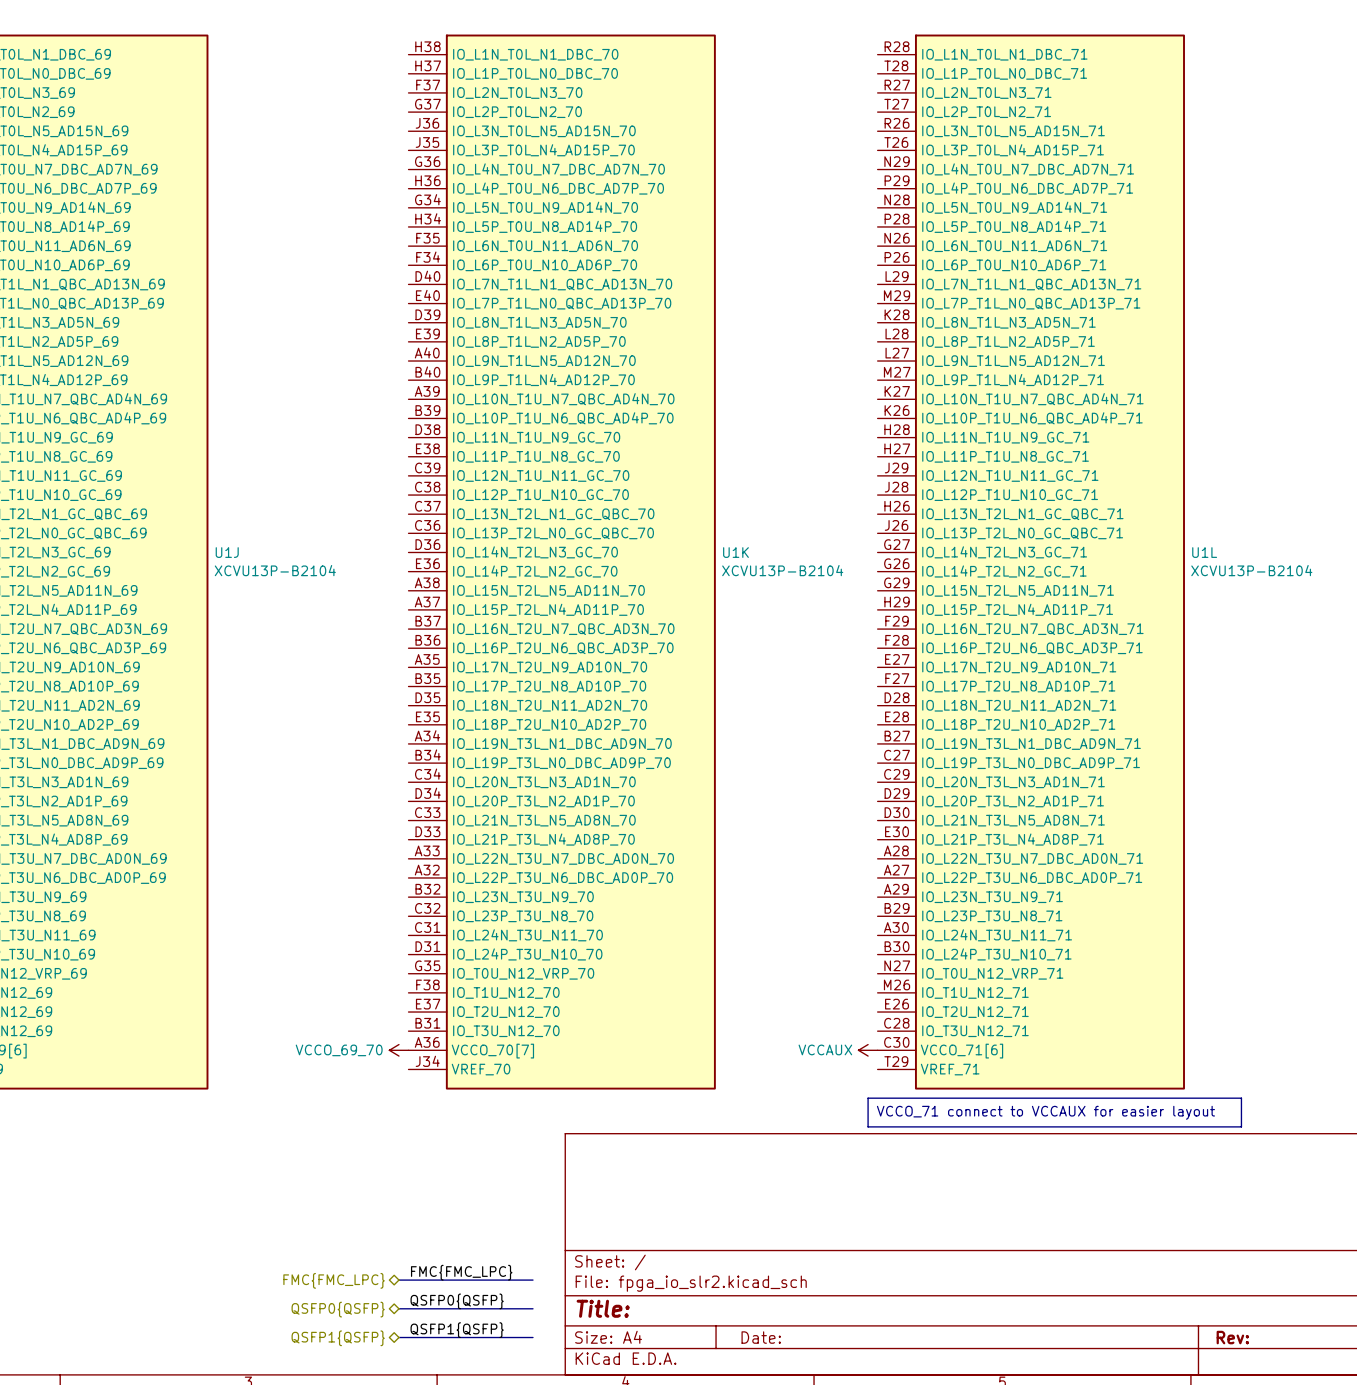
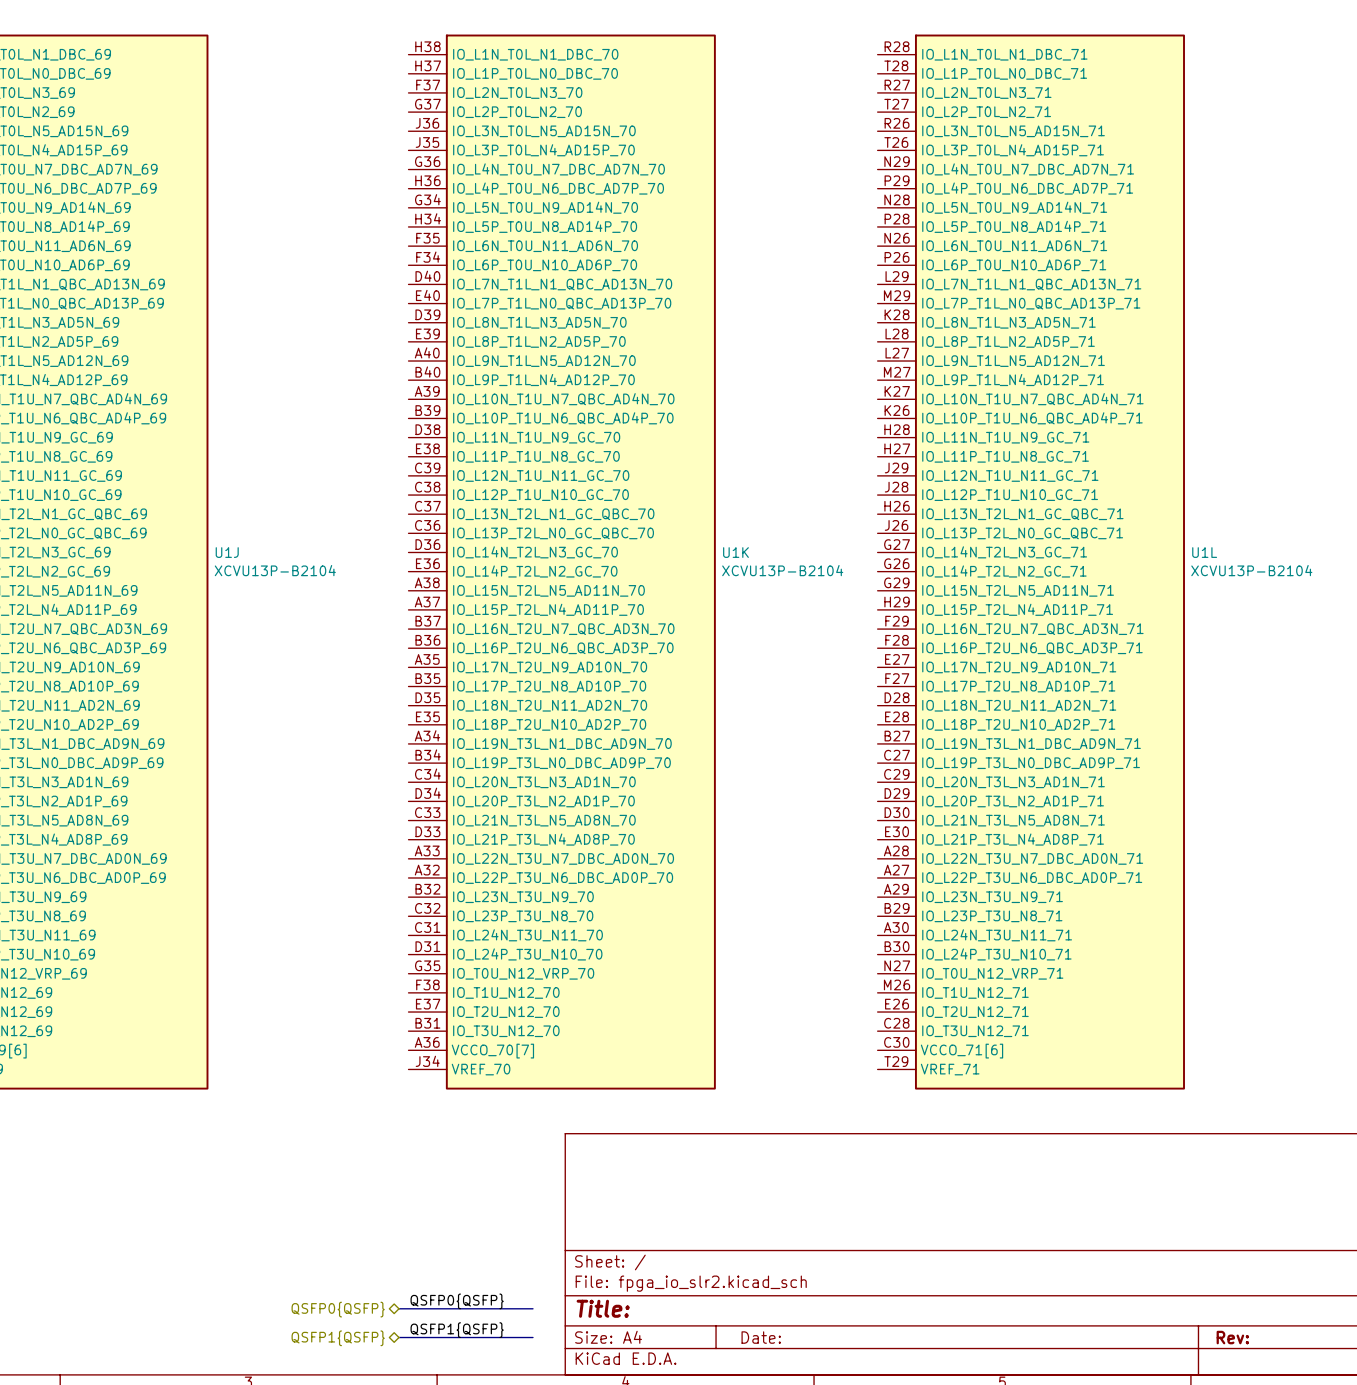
power symbol: VCCO_69_70 (398, 1050) -> none
power symbol: VCCAUX (868, 1050) -> none
line: (868, 1098) (1241, 1098) (1241, 1126) (868, 1126) (868, 1098) -> none
text: VCCO_71 connect to VCCAUX for easier layout (1045, 1112) -> none
label: FMC{FMC_LPC} (461, 1272) -> none
hierarchical label: FMC{FMC_LPC} (334, 1280) -> none
bus: (398, 1280) (532, 1280) -> none

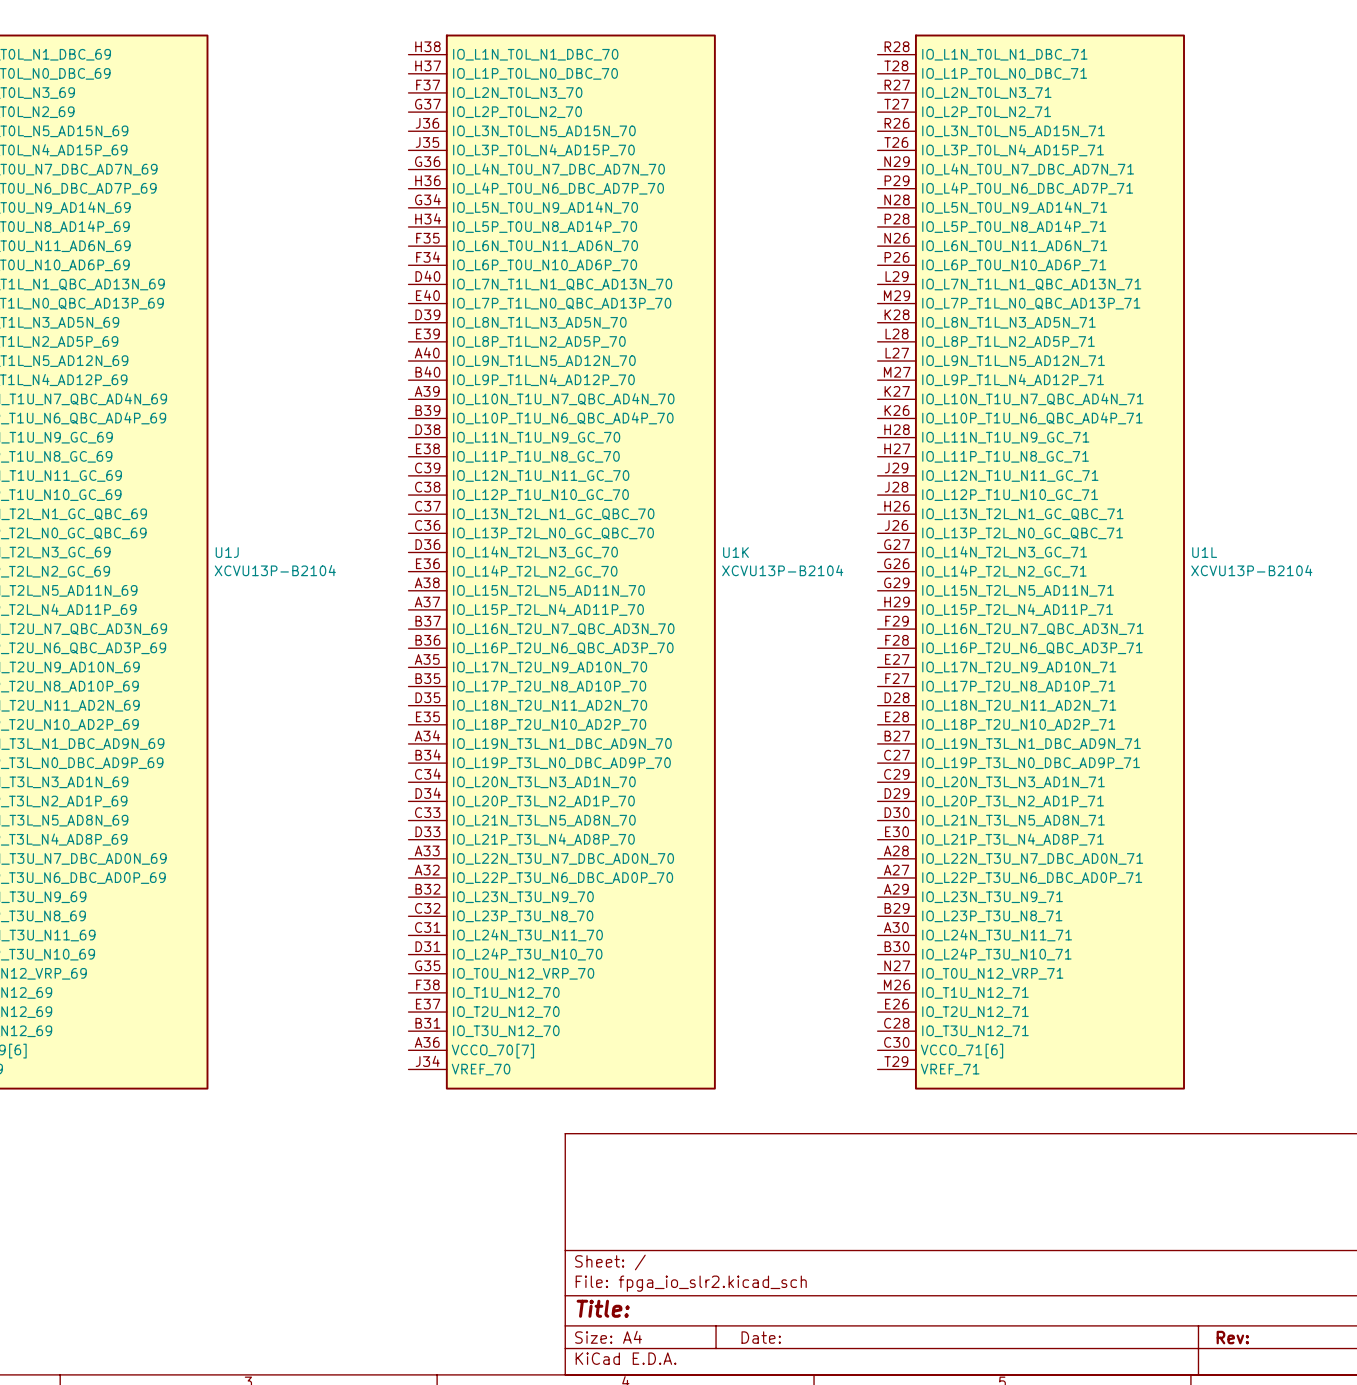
label: QSFP0{QSFP} (457, 1301) -> none
bus: (398, 1308) (532, 1308) -> none
hierarchical label: QSFP0{QSFP} (338, 1309) -> none
label: QSFP1{QSFP} (457, 1330) -> none
bus: (398, 1337) (532, 1337) -> none
hierarchical label: QSFP1{QSFP} (338, 1338) -> none

